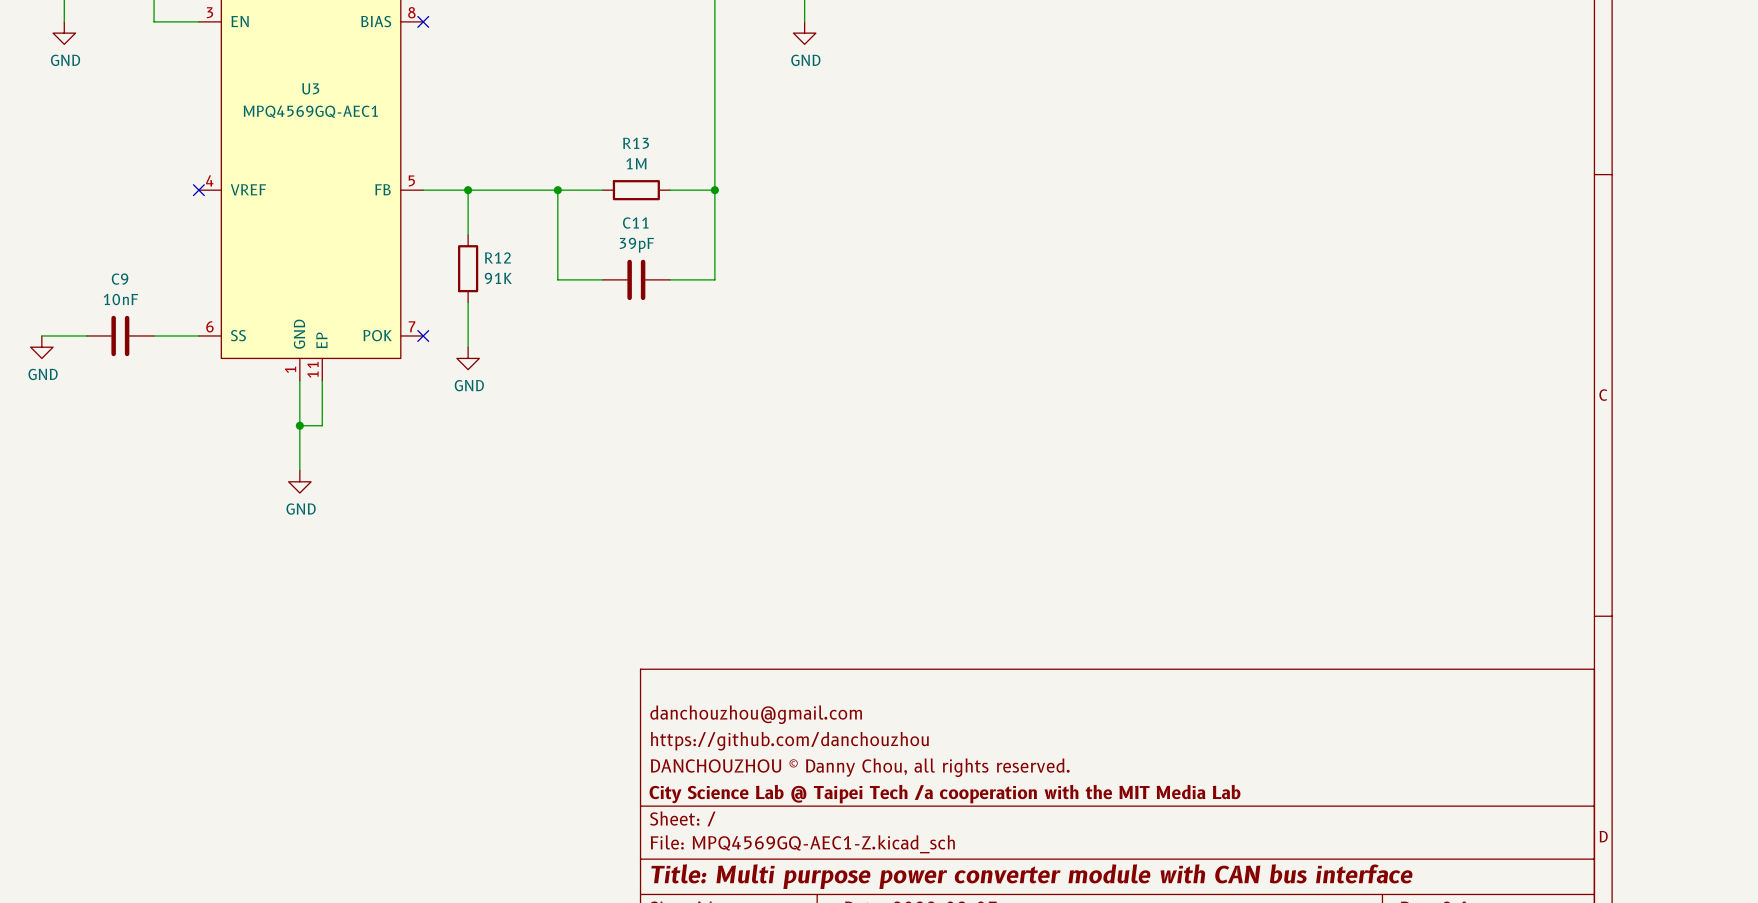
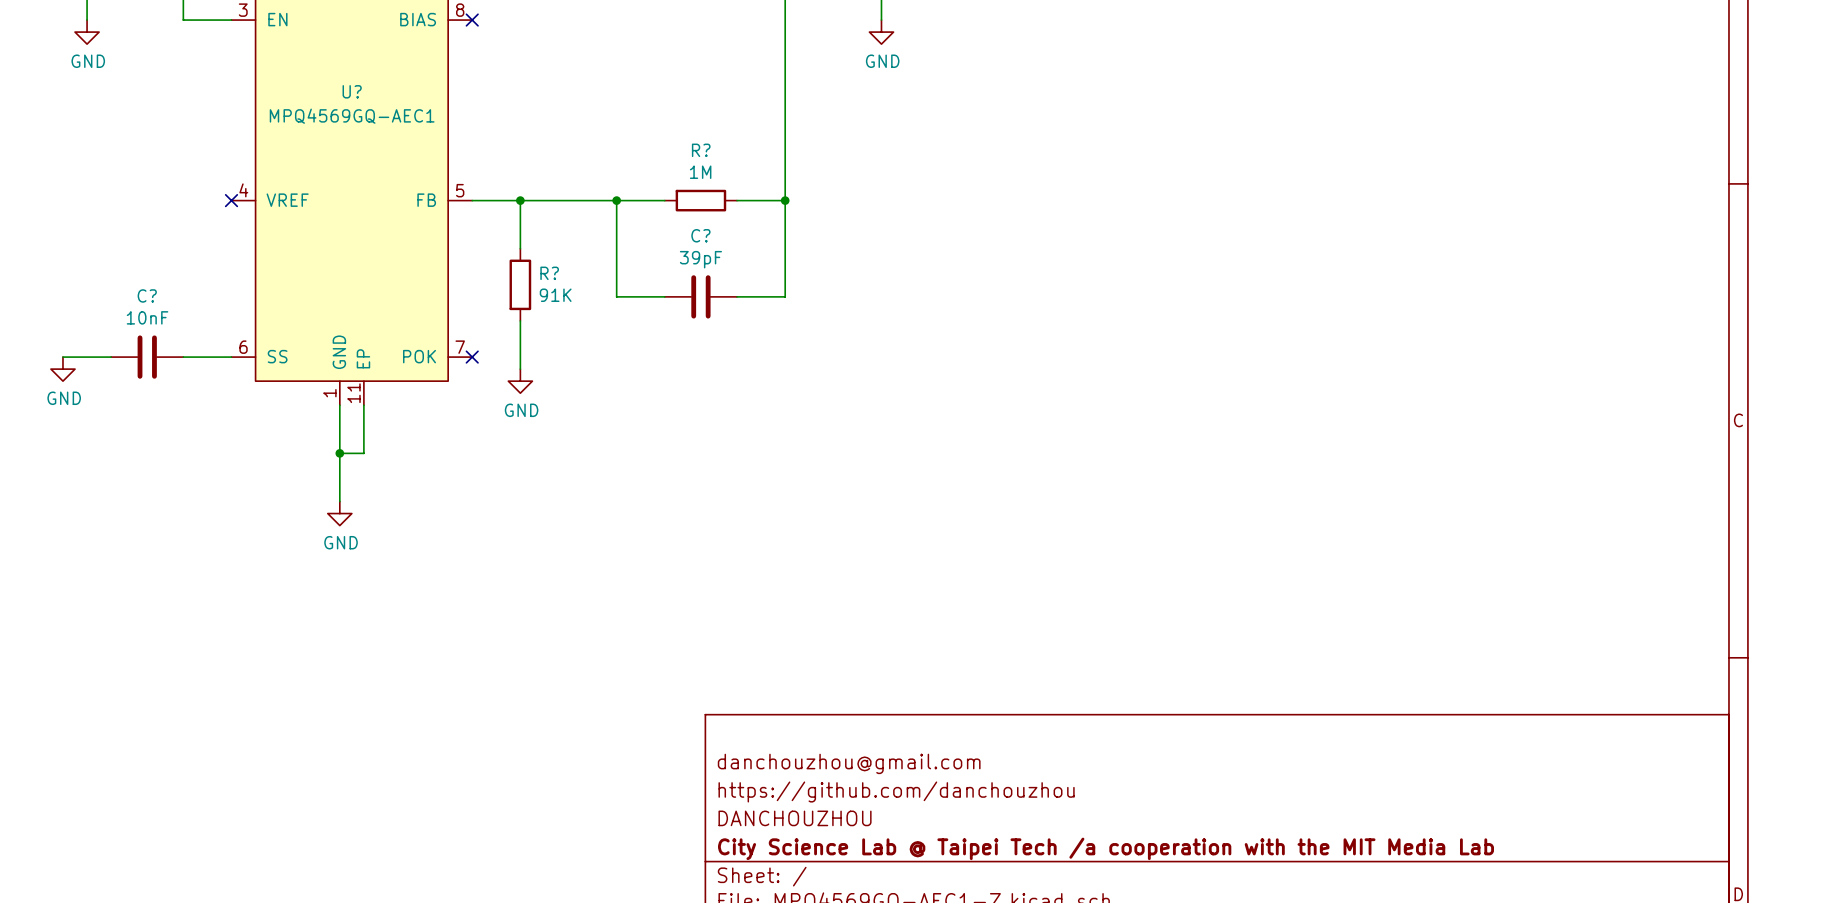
U3 name: U3 (310, 88) -> U? (352, 91)
R13 name: R13 (636, 143) -> R? (701, 150)
C11 name: C11 (635, 223) -> C? (700, 235)
R12 name: R12 (497, 257) -> R? (549, 273)
C9 name: C9 (120, 279) -> C? (147, 295)
title block: DANCHOUZHOU © Danny Chou, all rights reserved. (860, 767) -> DANCHOUZHOU (795, 818)

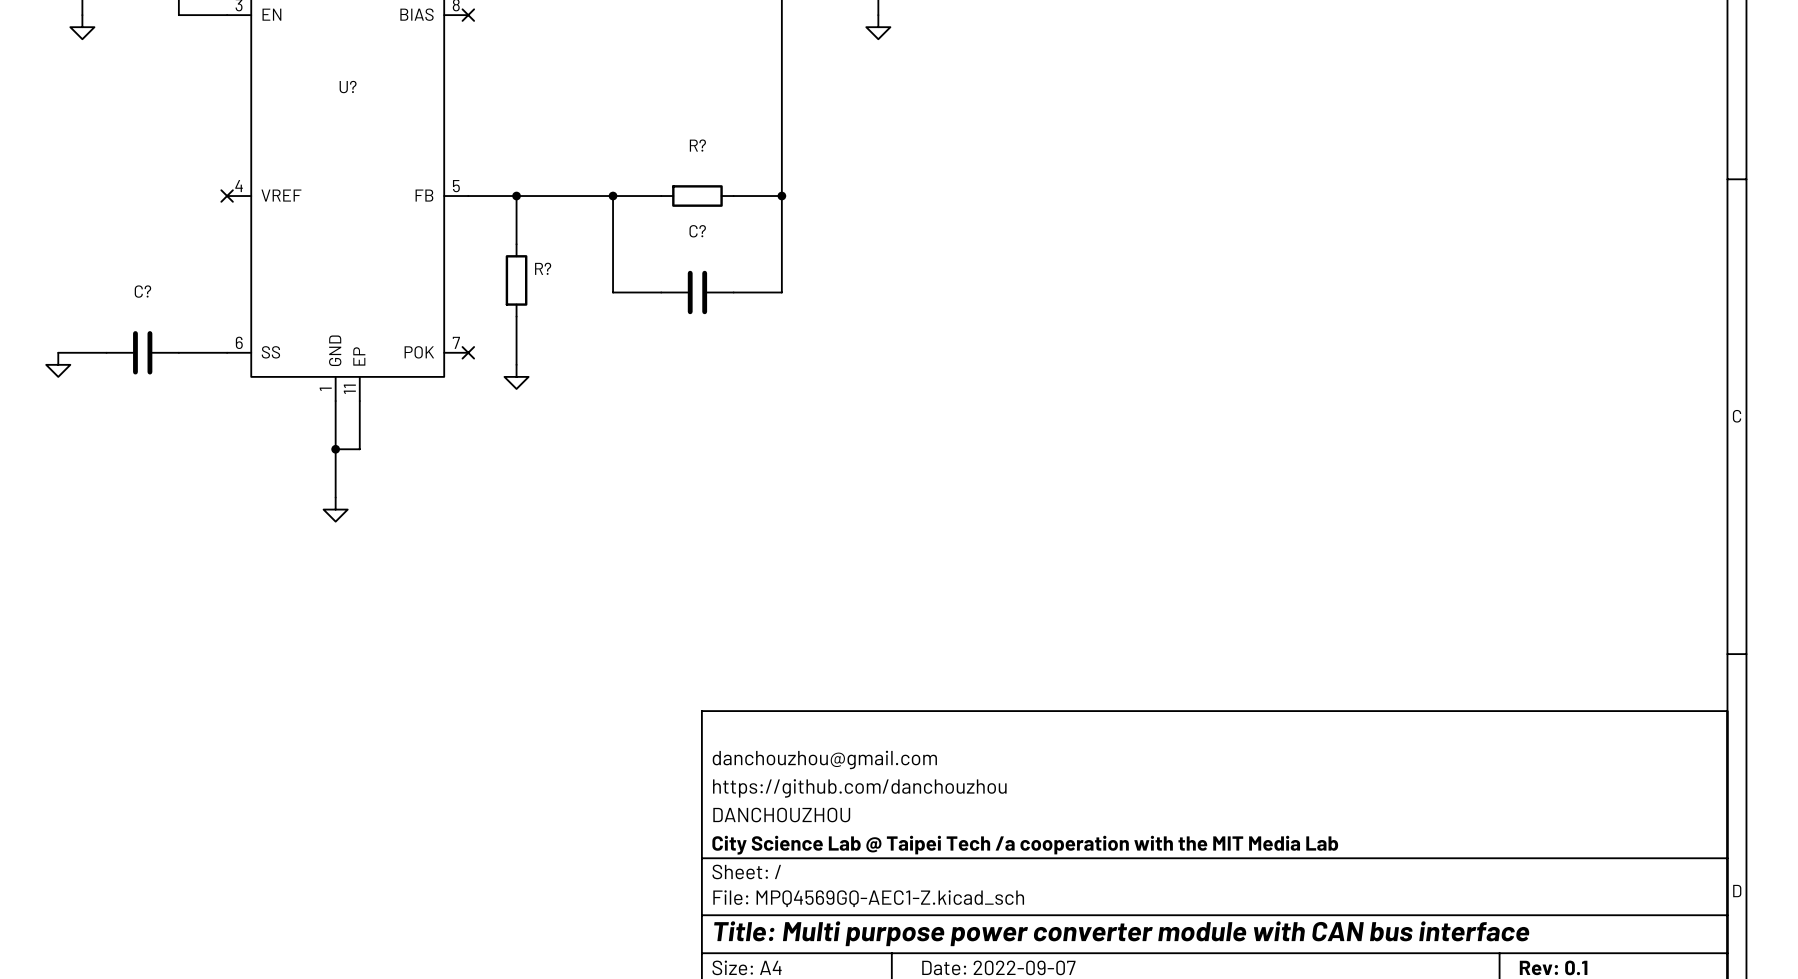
power symbol text: GND (88, 61) -> none
power symbol text: GND (882, 61) -> none
U? value: MPQ4569GQ-AEC1 (352, 116) -> none
R? value: 1M (700, 172) -> none
C? value: 39pF (700, 259) -> none
R? value: 91K (555, 295) -> none
C? value: 10nF (147, 317) -> none
power symbol text: GND (64, 398) -> none
power symbol text: GND (521, 410) -> none
power symbol text: GND (341, 542) -> none

